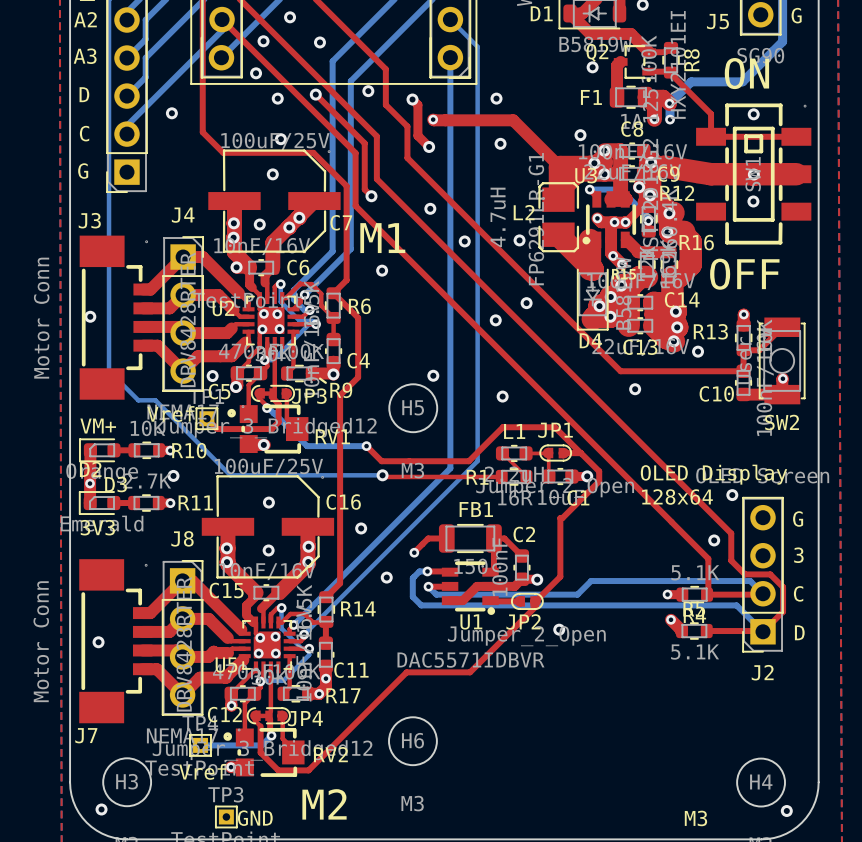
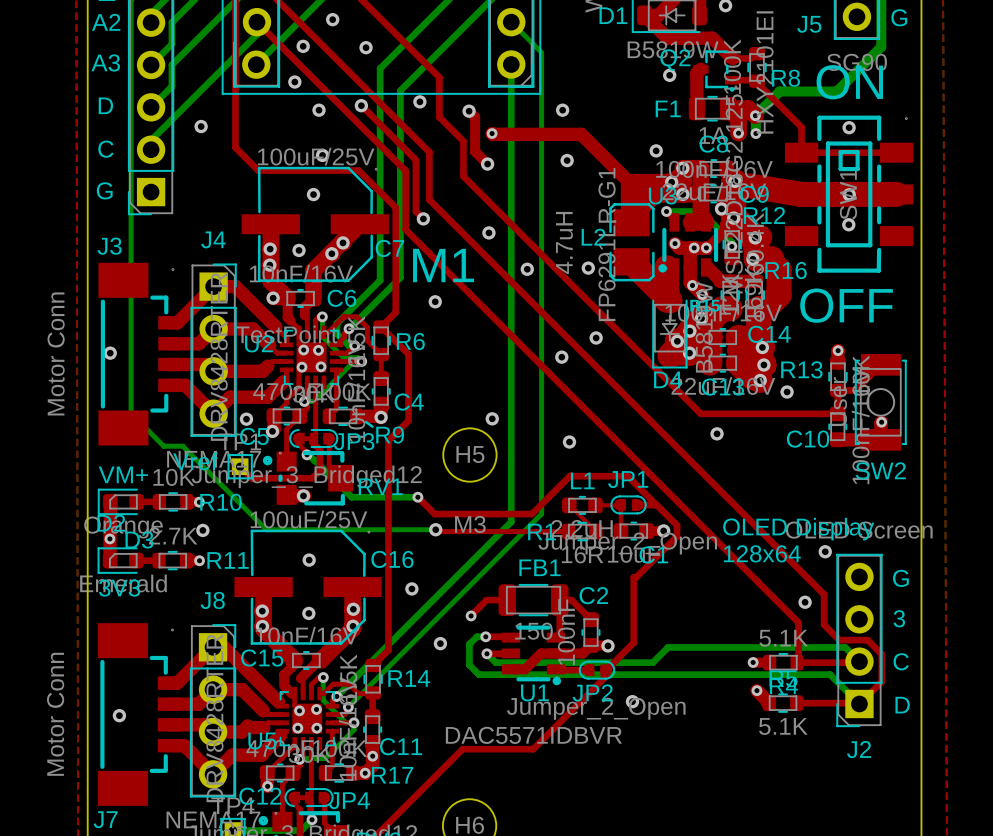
R8 name rotation: 0° (691, 60) -> 90° clockwise (786, 78)

